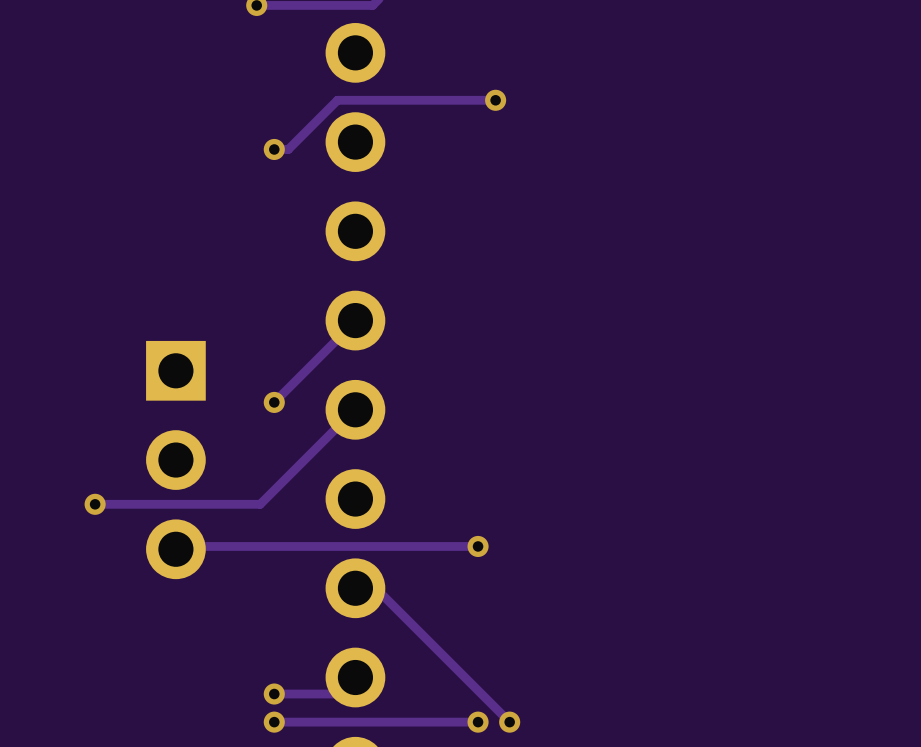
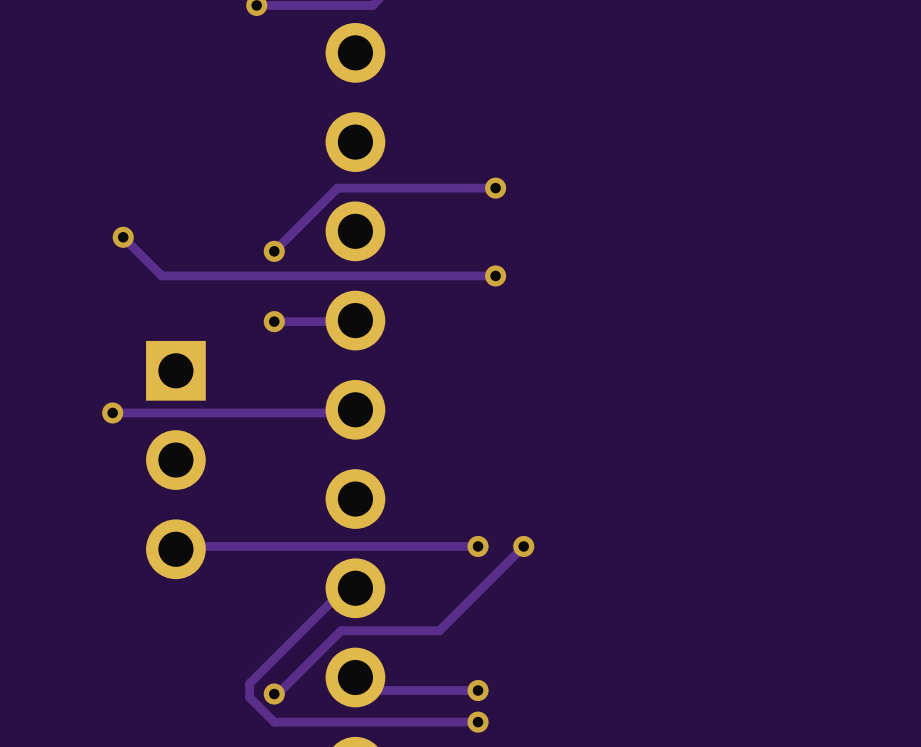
track: (495, 100) (337, 100) (288, 149) (274, 149) -> none
via: (495, 100) -> none
via: (274, 149) -> none
track: none -> (495, 188) (337, 188) (274, 251)
via: none -> (495, 188)
track: none -> (123, 237) (161, 275) (495, 275)
via: none -> (123, 237)
via: none -> (274, 251)
via: none -> (495, 275)
via: none -> (274, 321)
track: (355, 321) (274, 402) -> (355, 321) (274, 321)
via: (274, 402) -> none
track: (355, 409) (260, 504) (95, 504) -> none
via: none -> (112, 412)
track: none -> (351, 412) (112, 412)
via: (95, 504) -> none
track: none -> (523, 546) (439, 630) (341, 630) (281, 690) (274, 690)
via: none -> (523, 546)
track: none -> (344, 588) (249, 683) (249, 697) (274, 722)
track: (355, 588) (376, 588) (509, 722) -> none
track: (355, 676) (337, 694) (274, 694) -> (355, 676) (369, 690) (478, 690)
via: (274, 722) -> none
via position: (509, 722) -> (478, 690)

